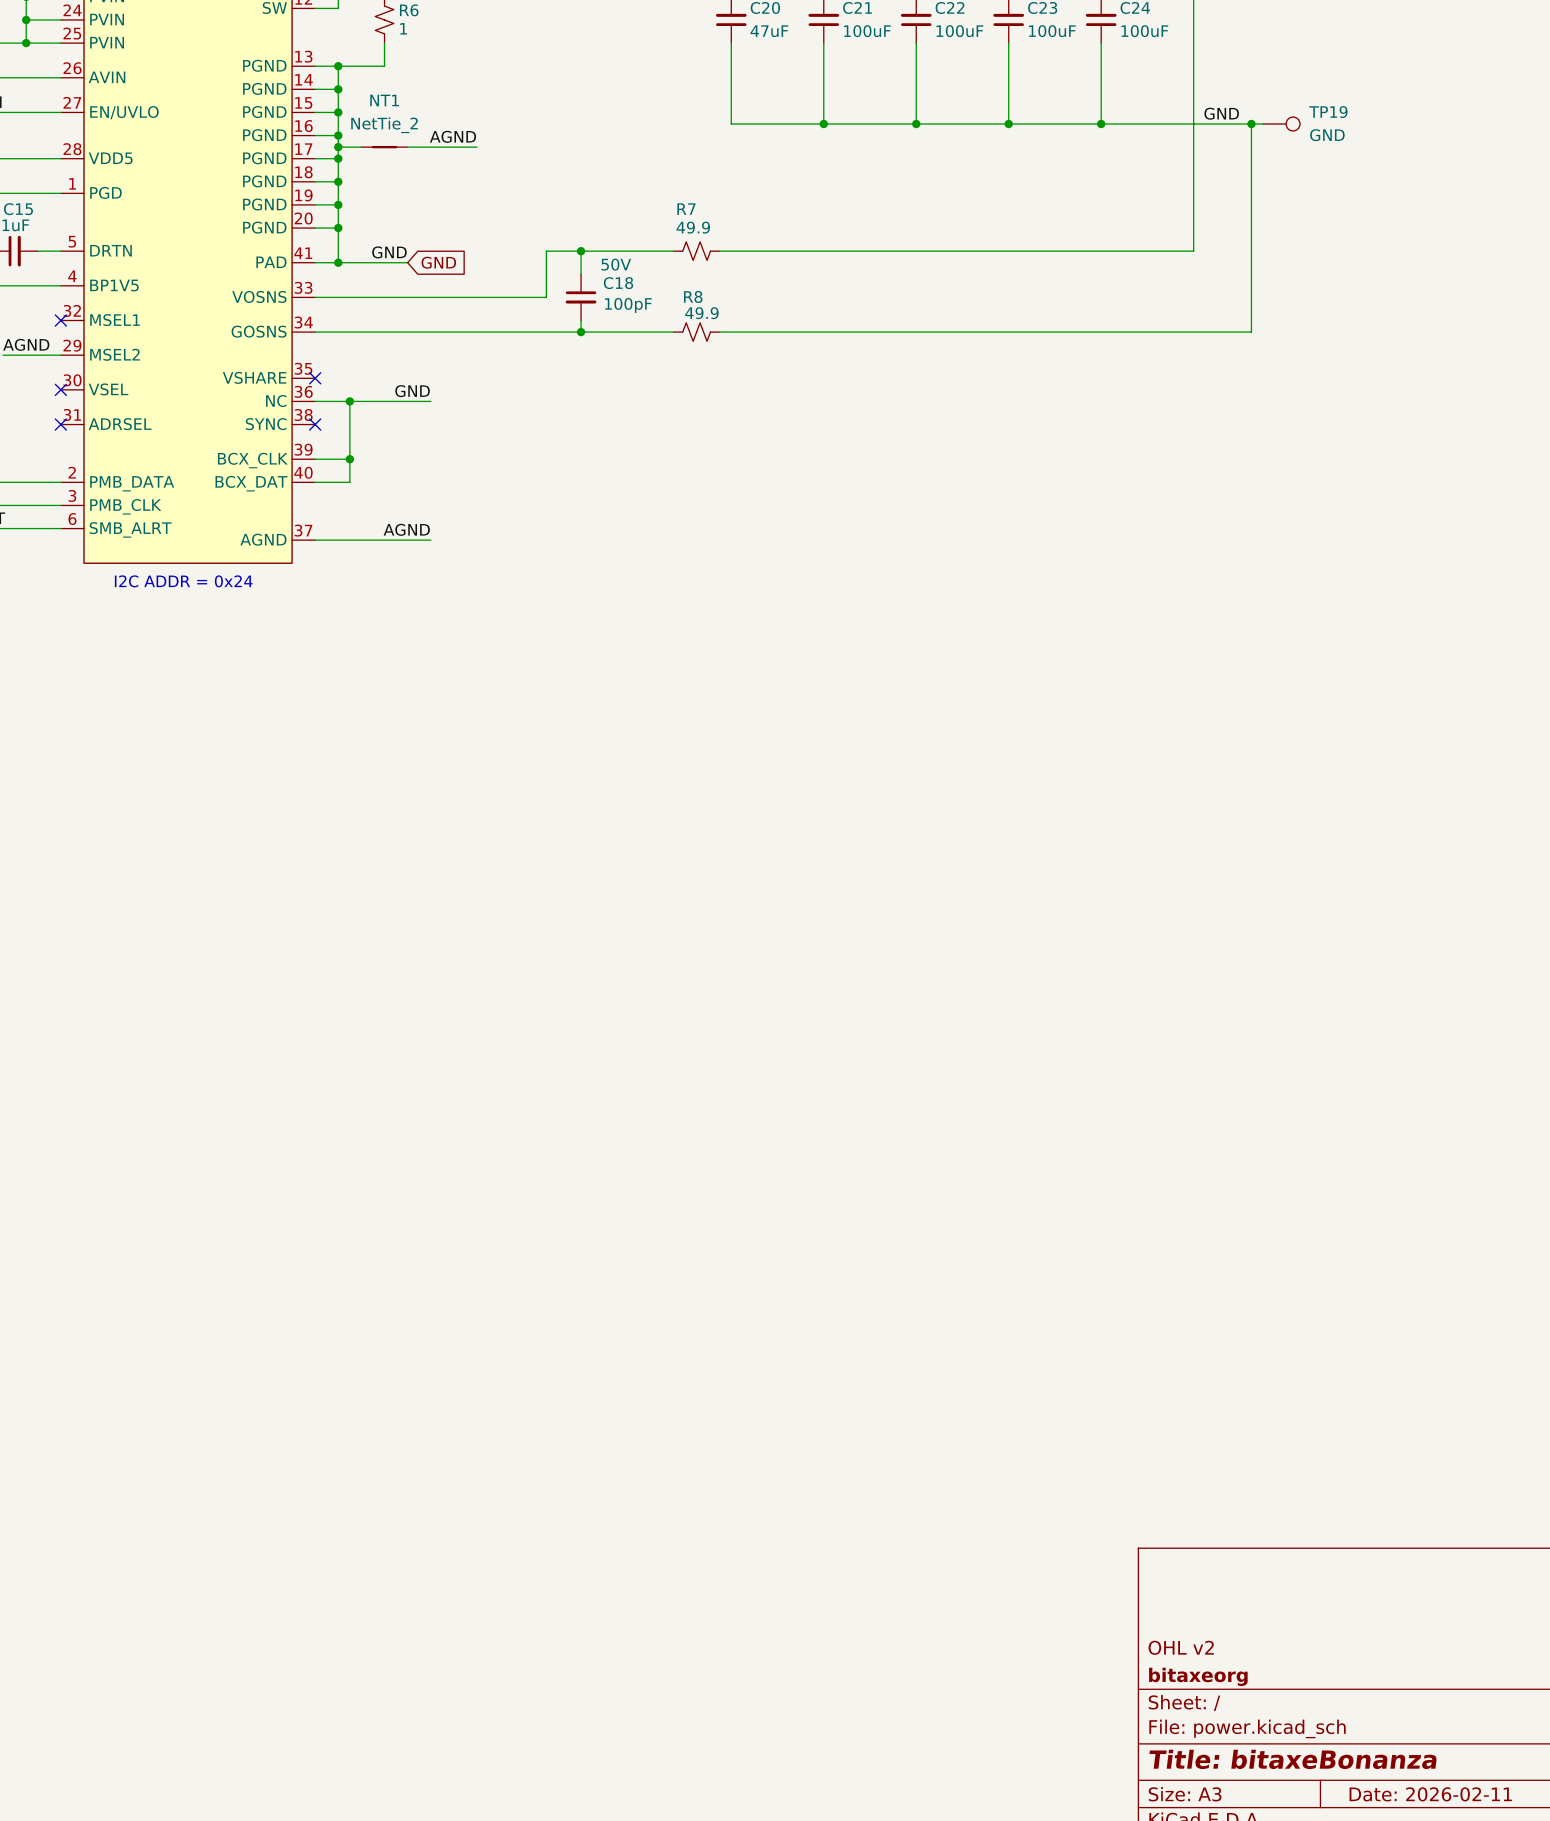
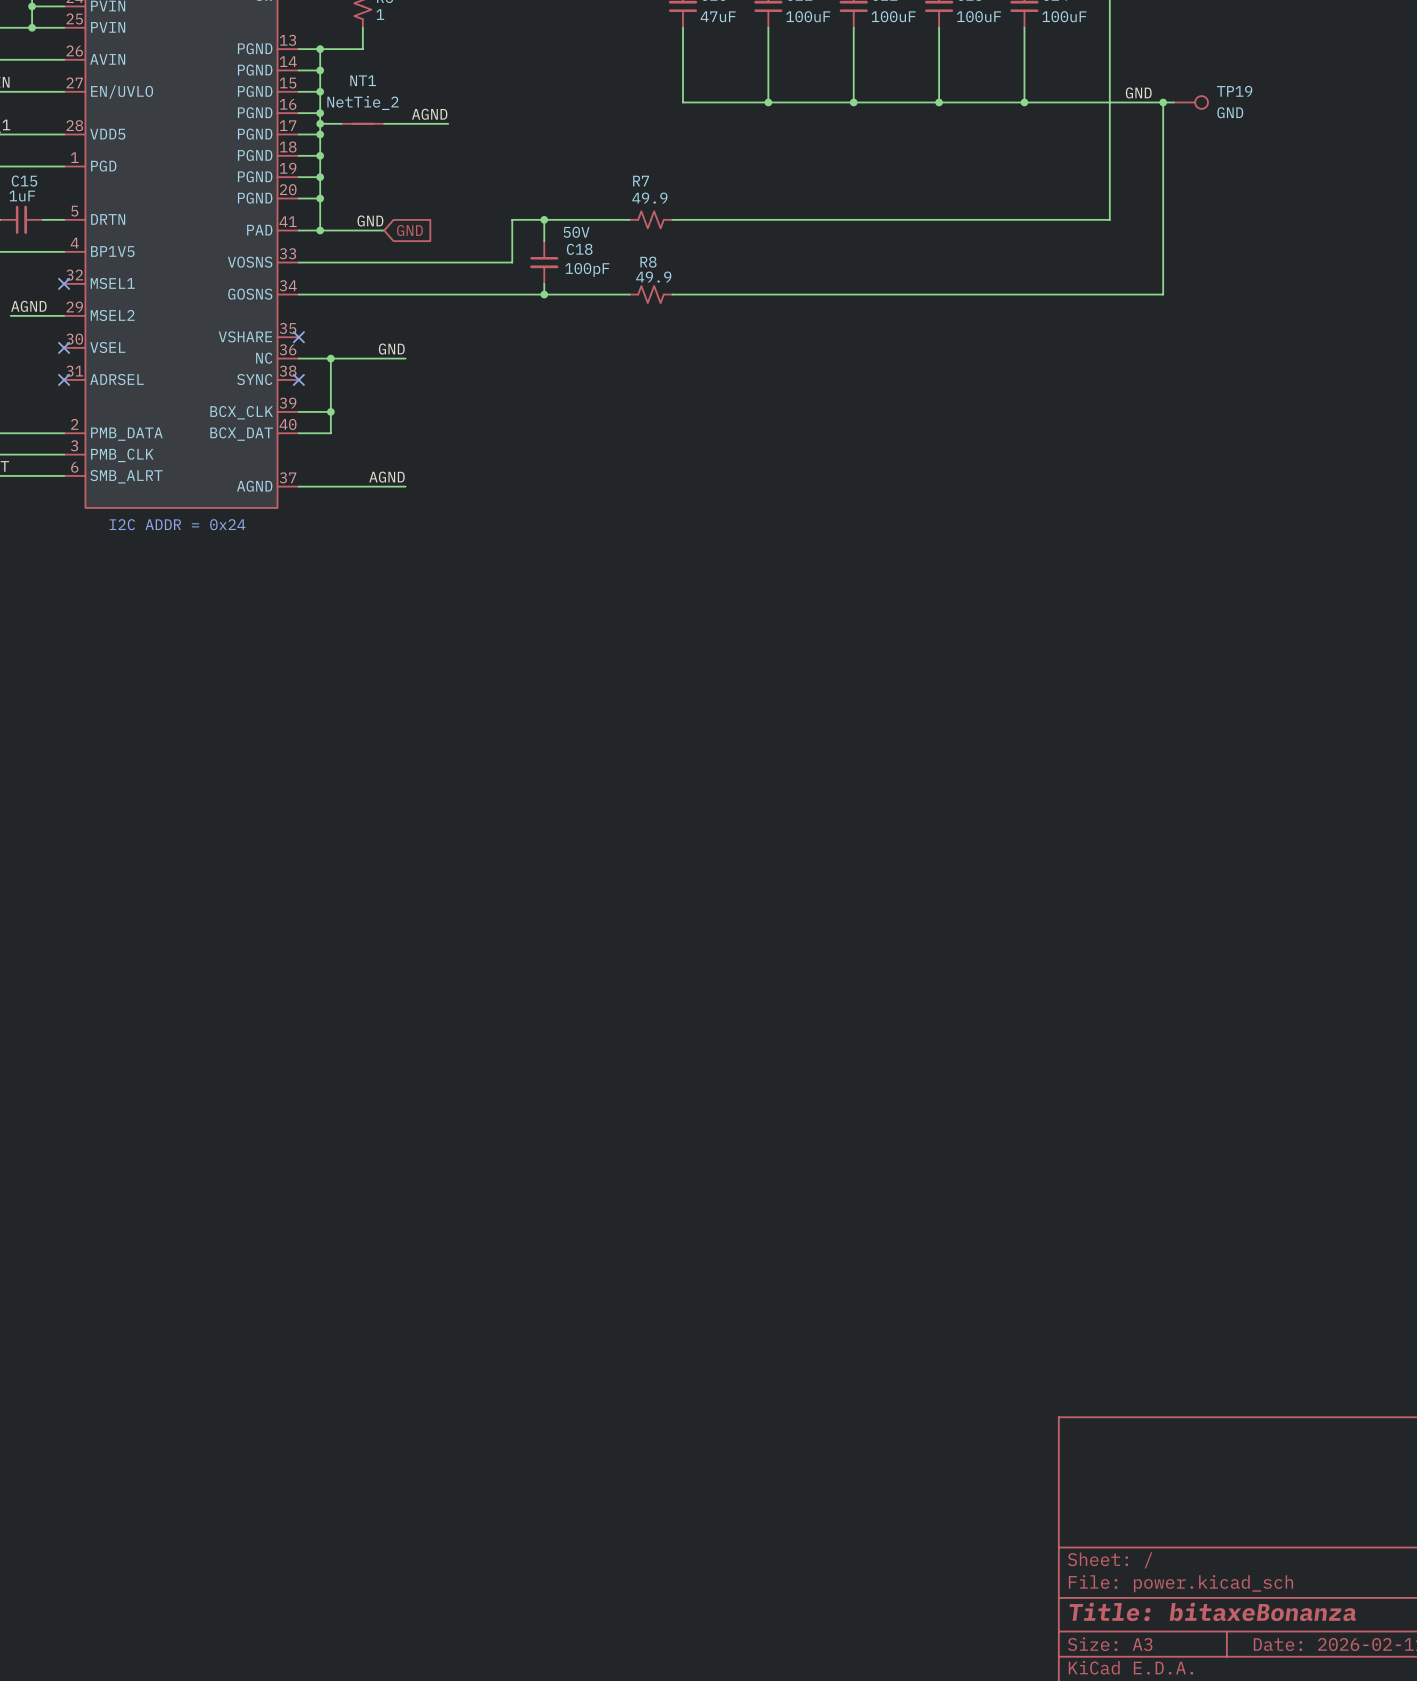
title block: OHL v2 (1181, 1647) -> none
title block: bitaxeorg (1198, 1676) -> none

